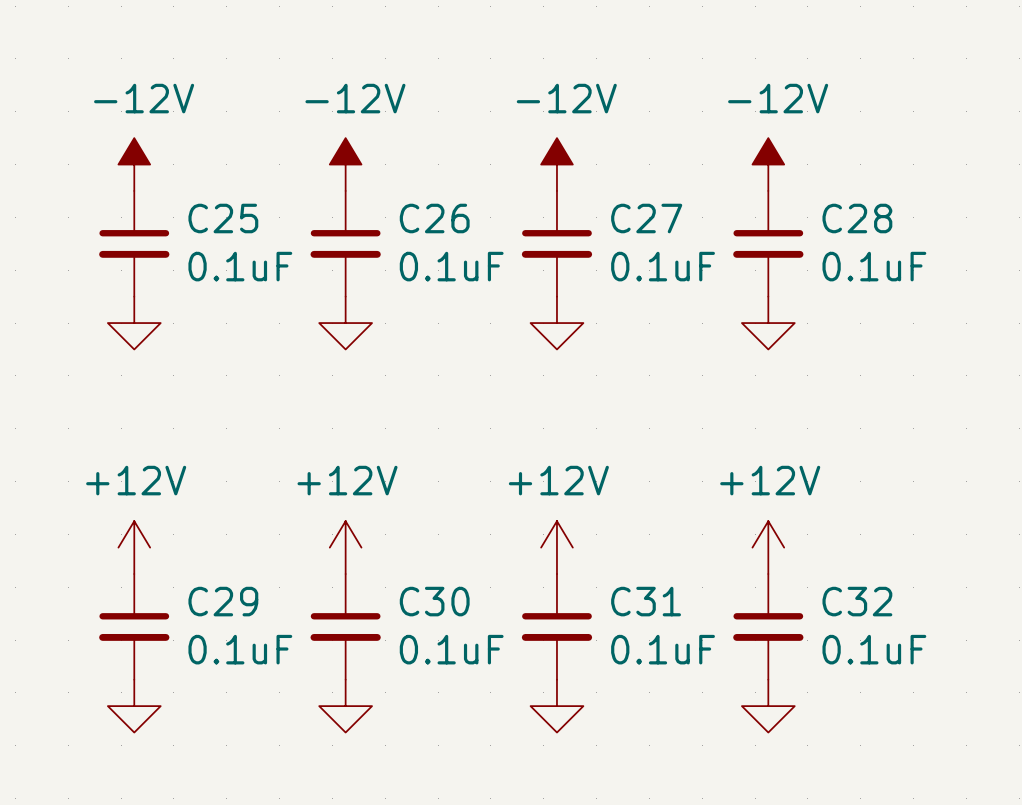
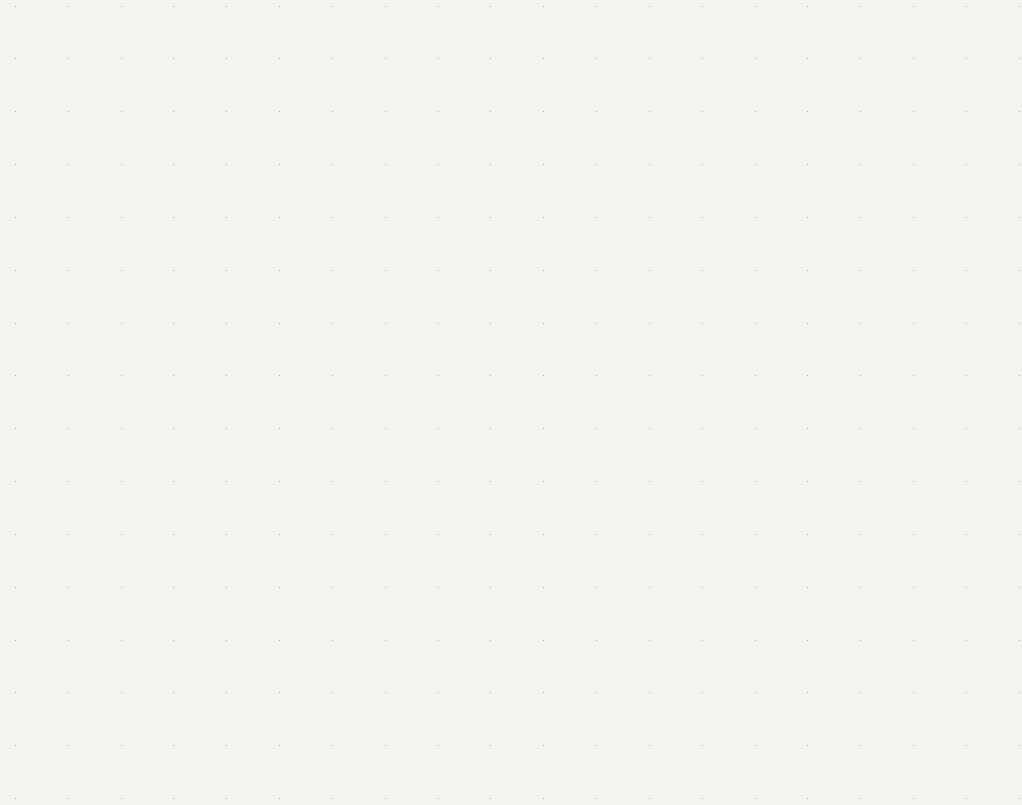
power symbol: -12V (134, 164) -> none
power symbol: -12V (345, 164) -> none
power symbol: -12V (556, 164) -> none
power symbol: -12V (768, 164) -> none
C25: 0.1uF (134, 243) -> none
C26: 0.1uF (345, 243) -> none
C27: 0.1uF (556, 243) -> none
C28: 0.1uF (768, 243) -> none
power symbol: (134, 323) -> none
power symbol: (345, 323) -> none
power symbol: (556, 323) -> none
power symbol: (768, 323) -> none
power symbol: +12V (134, 547) -> none
power symbol: +12V (345, 547) -> none
power symbol: +12V (556, 547) -> none
power symbol: +12V (768, 547) -> none
C29: 0.1uF (134, 626) -> none
C30: 0.1uF (345, 626) -> none
C31: 0.1uF (556, 626) -> none
C32: 0.1uF (768, 626) -> none
power symbol: (134, 706) -> none
power symbol: (345, 706) -> none
power symbol: (556, 706) -> none
power symbol: (768, 706) -> none

